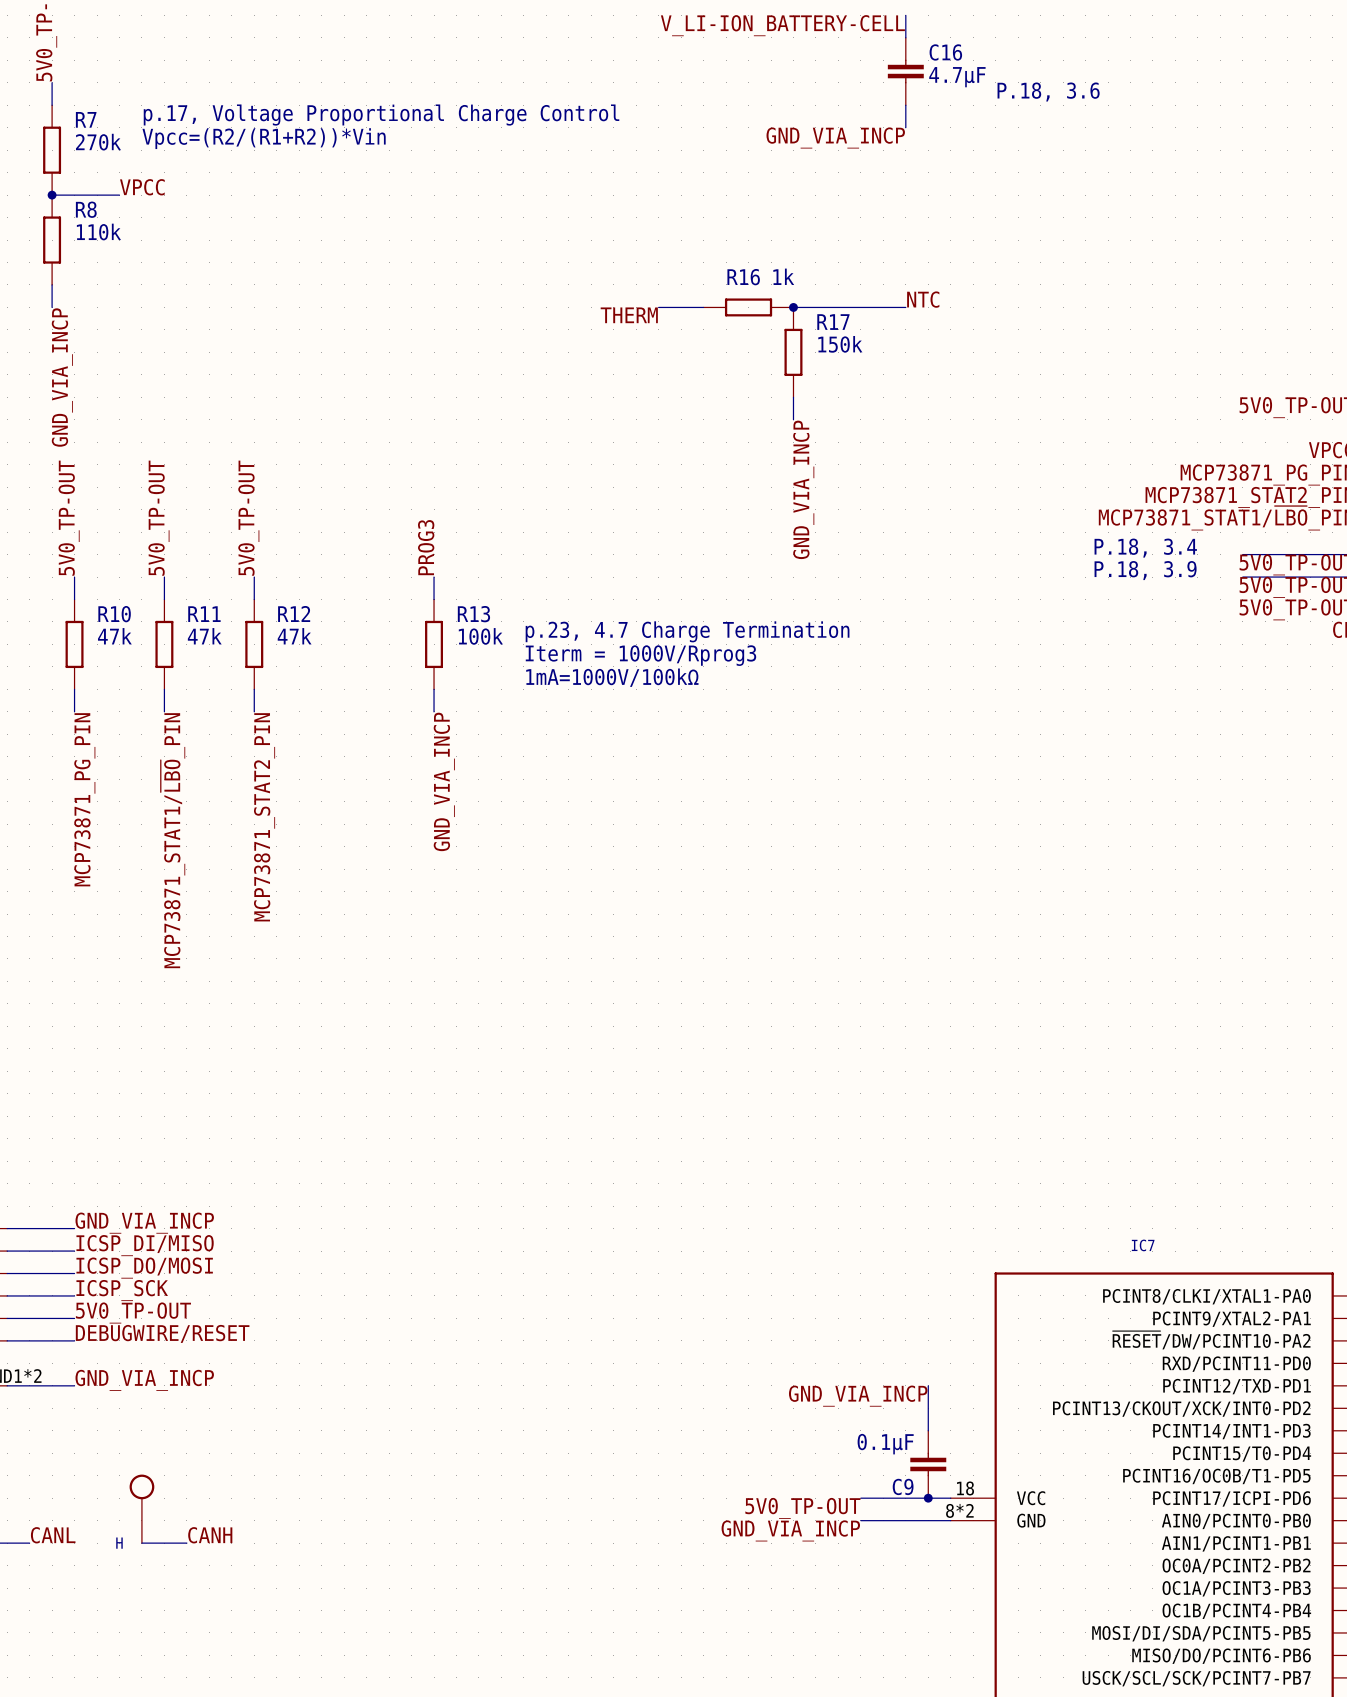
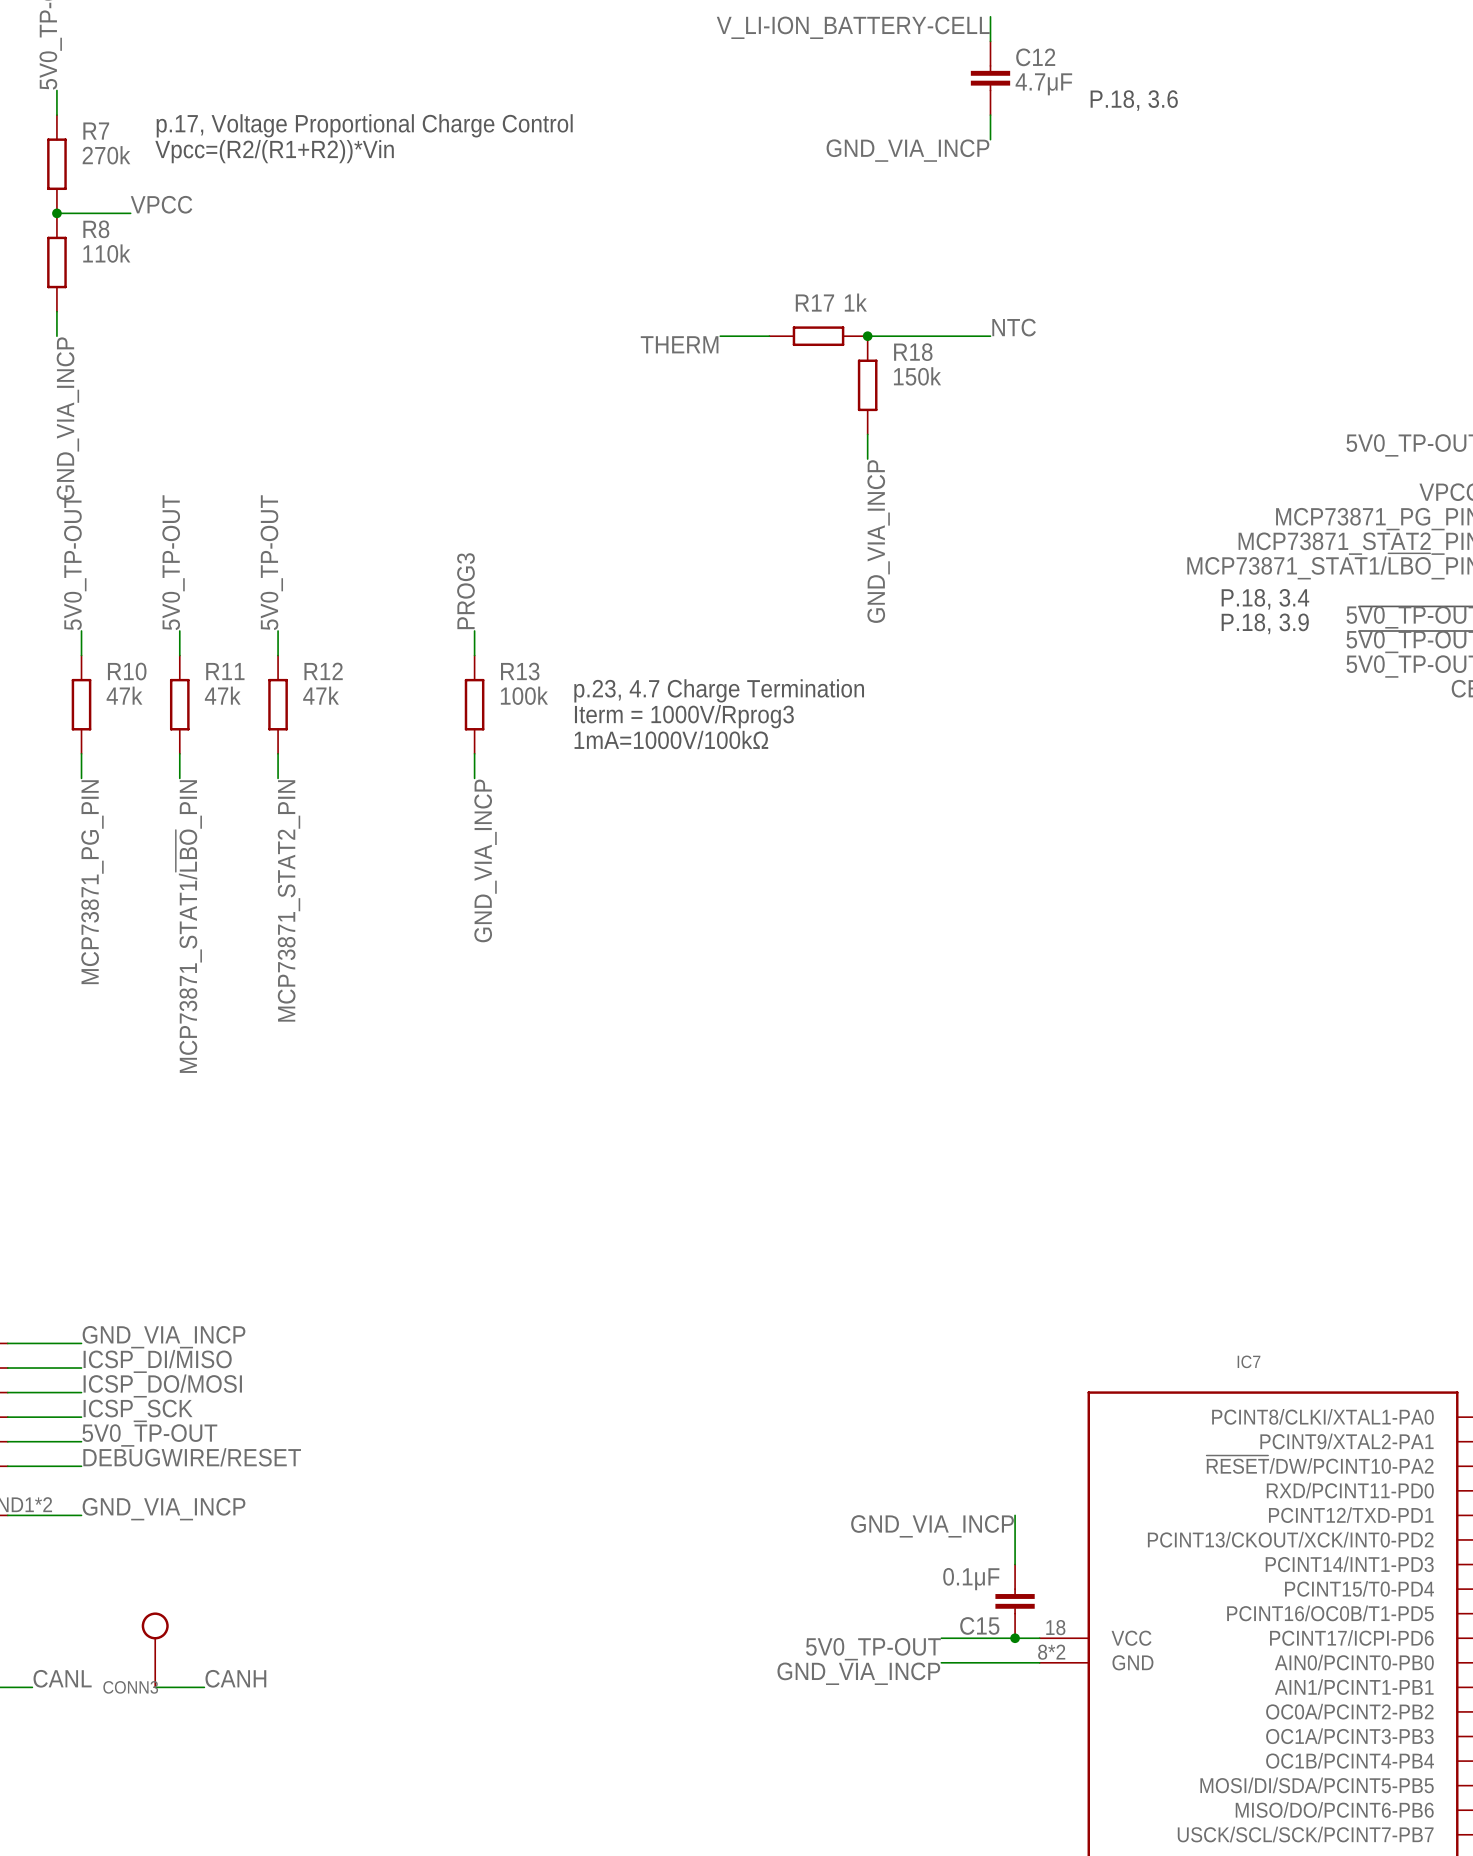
C16 name: C16 (945, 52) -> C12 (1035, 57)
R16 name: R16 (743, 277) -> R17 (814, 303)
R17 name: R17 (833, 322) -> R18 (913, 352)
C9 name: C9 (903, 1486) -> C15 (979, 1625)
H name: H (119, 1543) -> CONN3 (130, 1687)

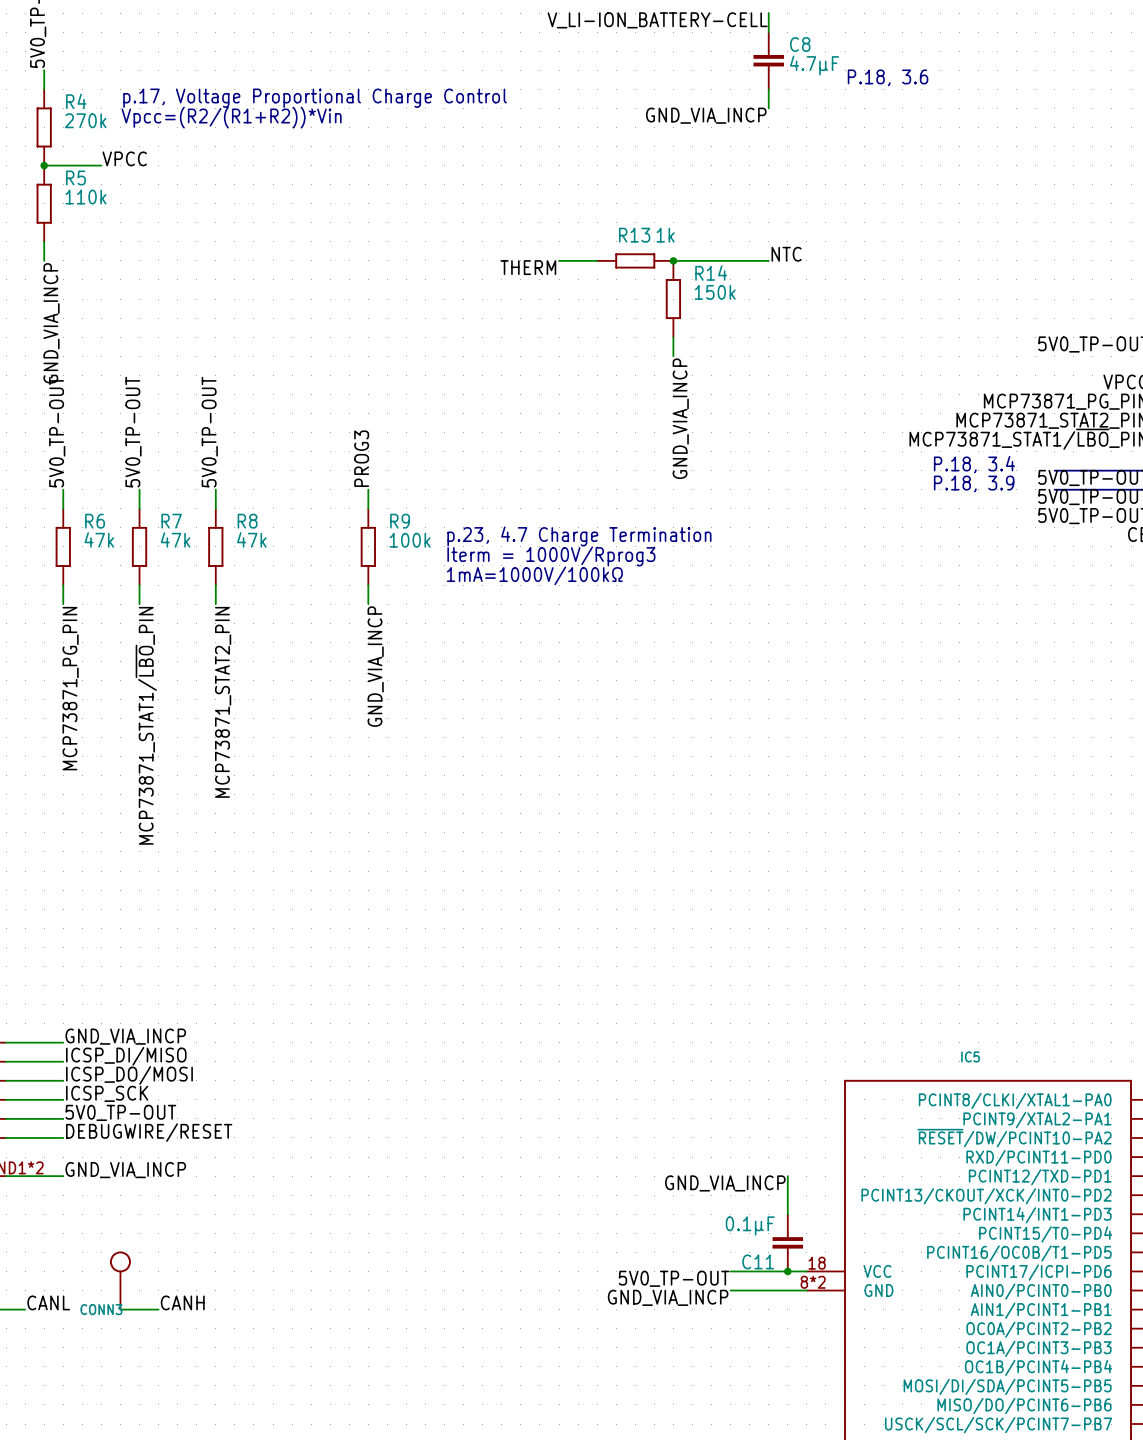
C12 name: C12 (1035, 57) -> C8 (800, 44)
R7 name: R7 (96, 131) -> R4 (76, 101)
R8 name: R8 (96, 229) -> R5 (75, 177)
R17 name: R17 (814, 303) -> R13 (634, 235)
R18 name: R18 (913, 352) -> R14 (711, 273)
R10 name: R10 (127, 671) -> R6 (95, 521)
R11 name: R11 (225, 671) -> R7 (171, 521)
R12 name: R12 (323, 671) -> R8 (247, 521)
R13 name: R13 (520, 671) -> R9 (400, 521)
IC7 name: IC7 (1249, 1361) -> IC5 (970, 1056)
C15 name: C15 (979, 1625) -> C11 (758, 1261)

